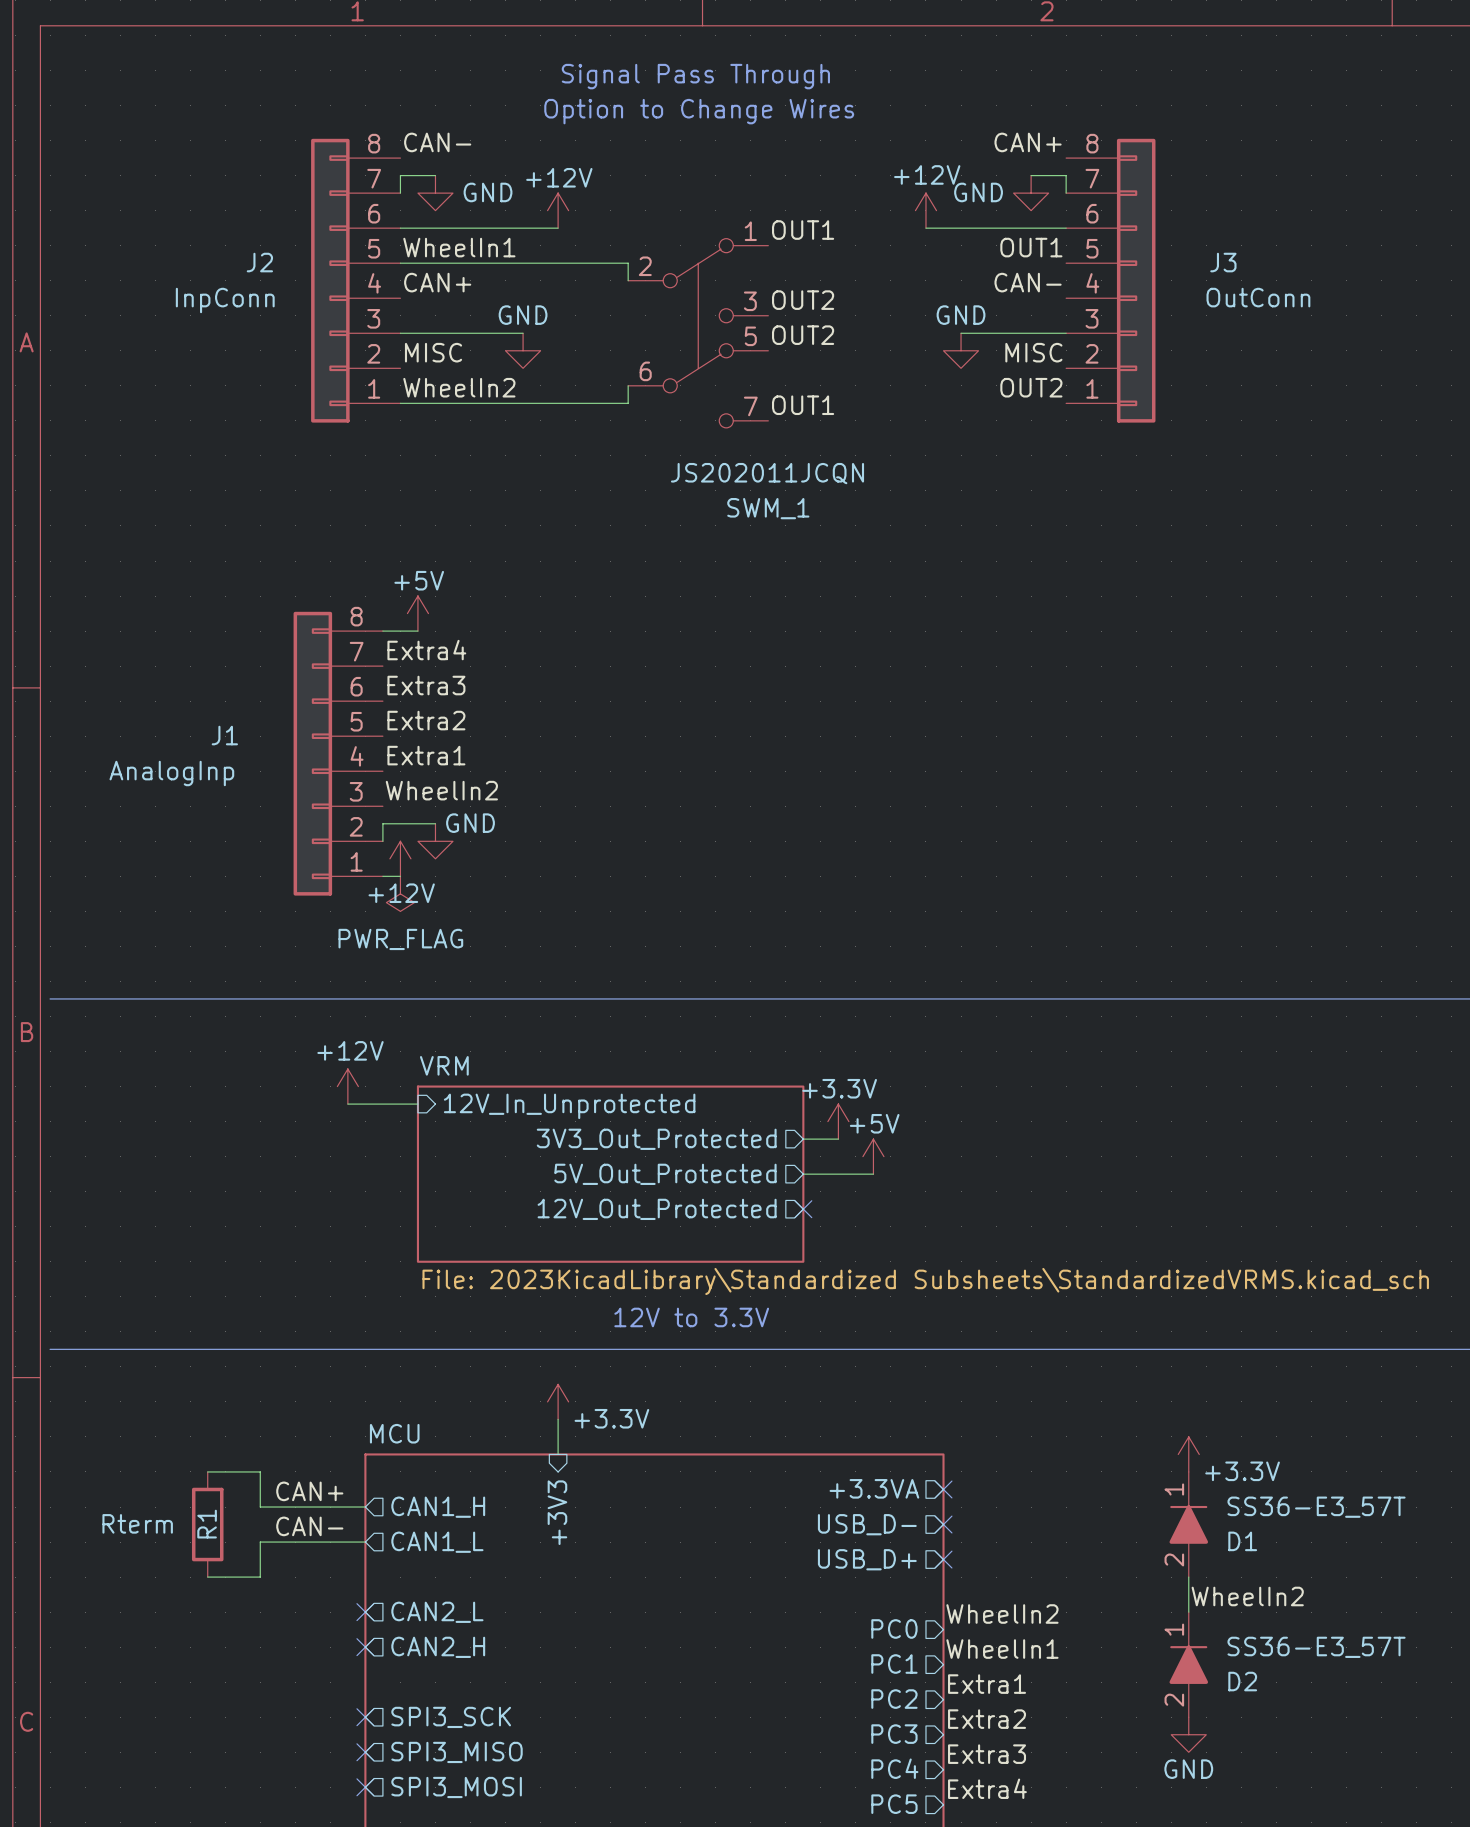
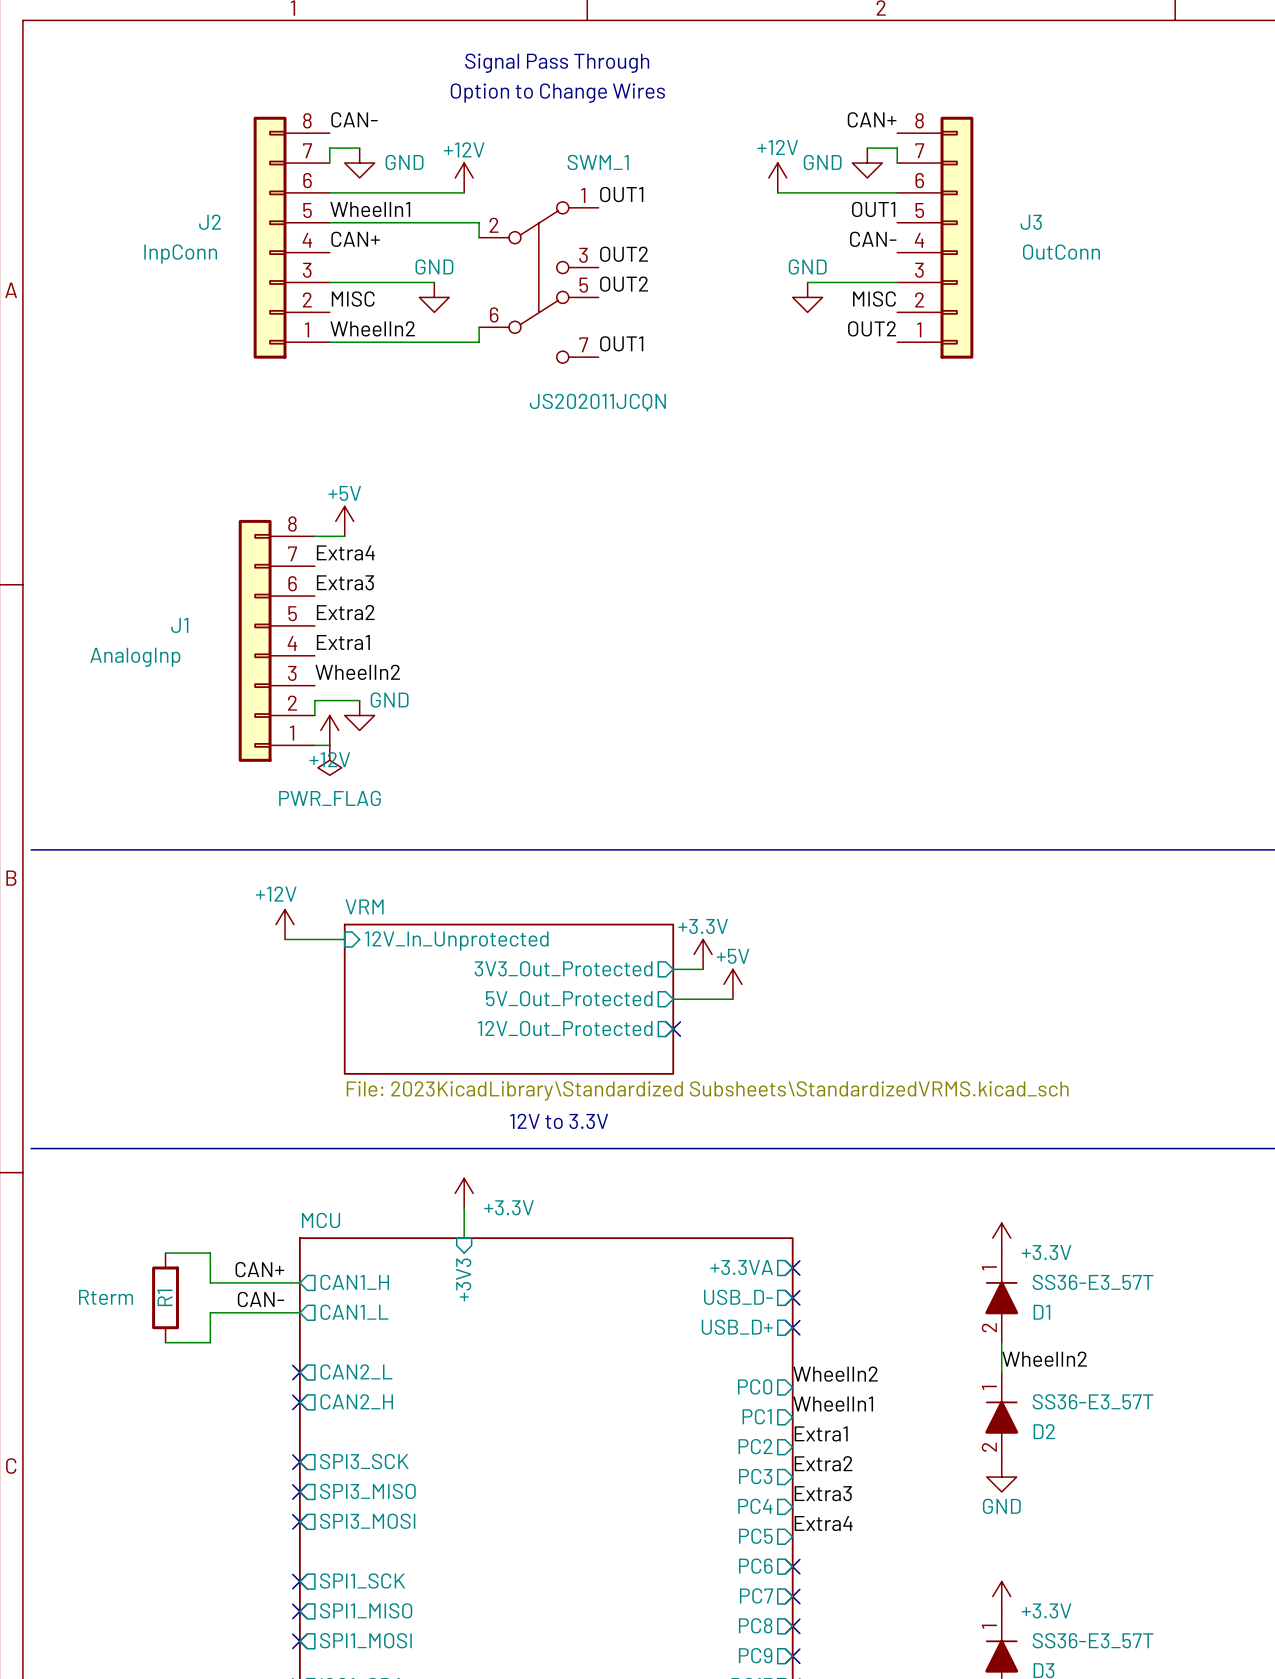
label position: OUT1 (803, 230) -> OUT1 (621, 194)
wire: (575, 263) (628, 263) (628, 280) -> (479, 222) (479, 237)
label: none -> OUT2 (624, 254)
label: OUT2 (803, 300) -> none
SWM_1 position: (698, 333) -> (538, 282)
label: none -> OUT2 (624, 284)
label: OUT2 (803, 335) -> none
wire: (628, 385) (628, 403) (575, 403) -> (479, 327) (479, 342)
label position: OUT1 (803, 405) -> OUT1 (621, 343)
SWM_1 name position: SWM_1 (768, 508) -> SWM_1 (598, 162)

